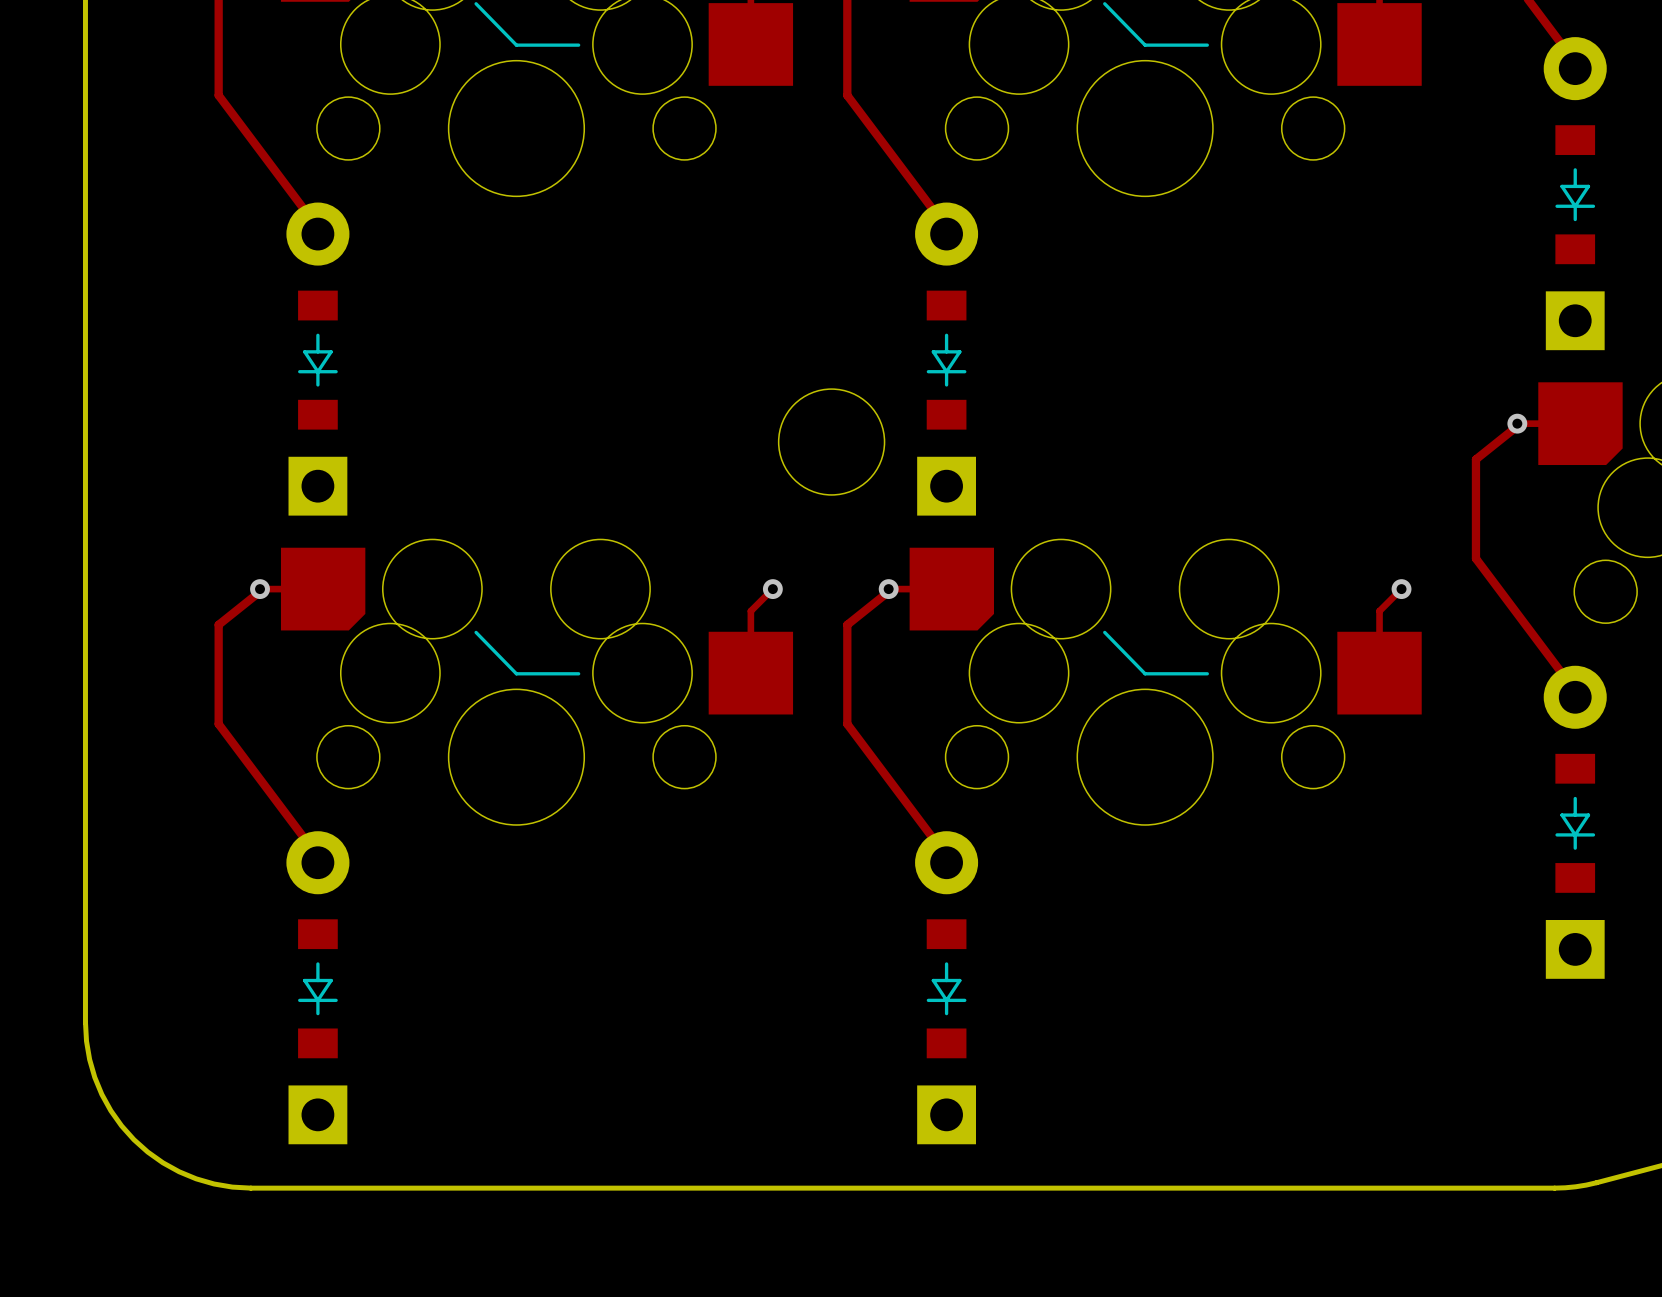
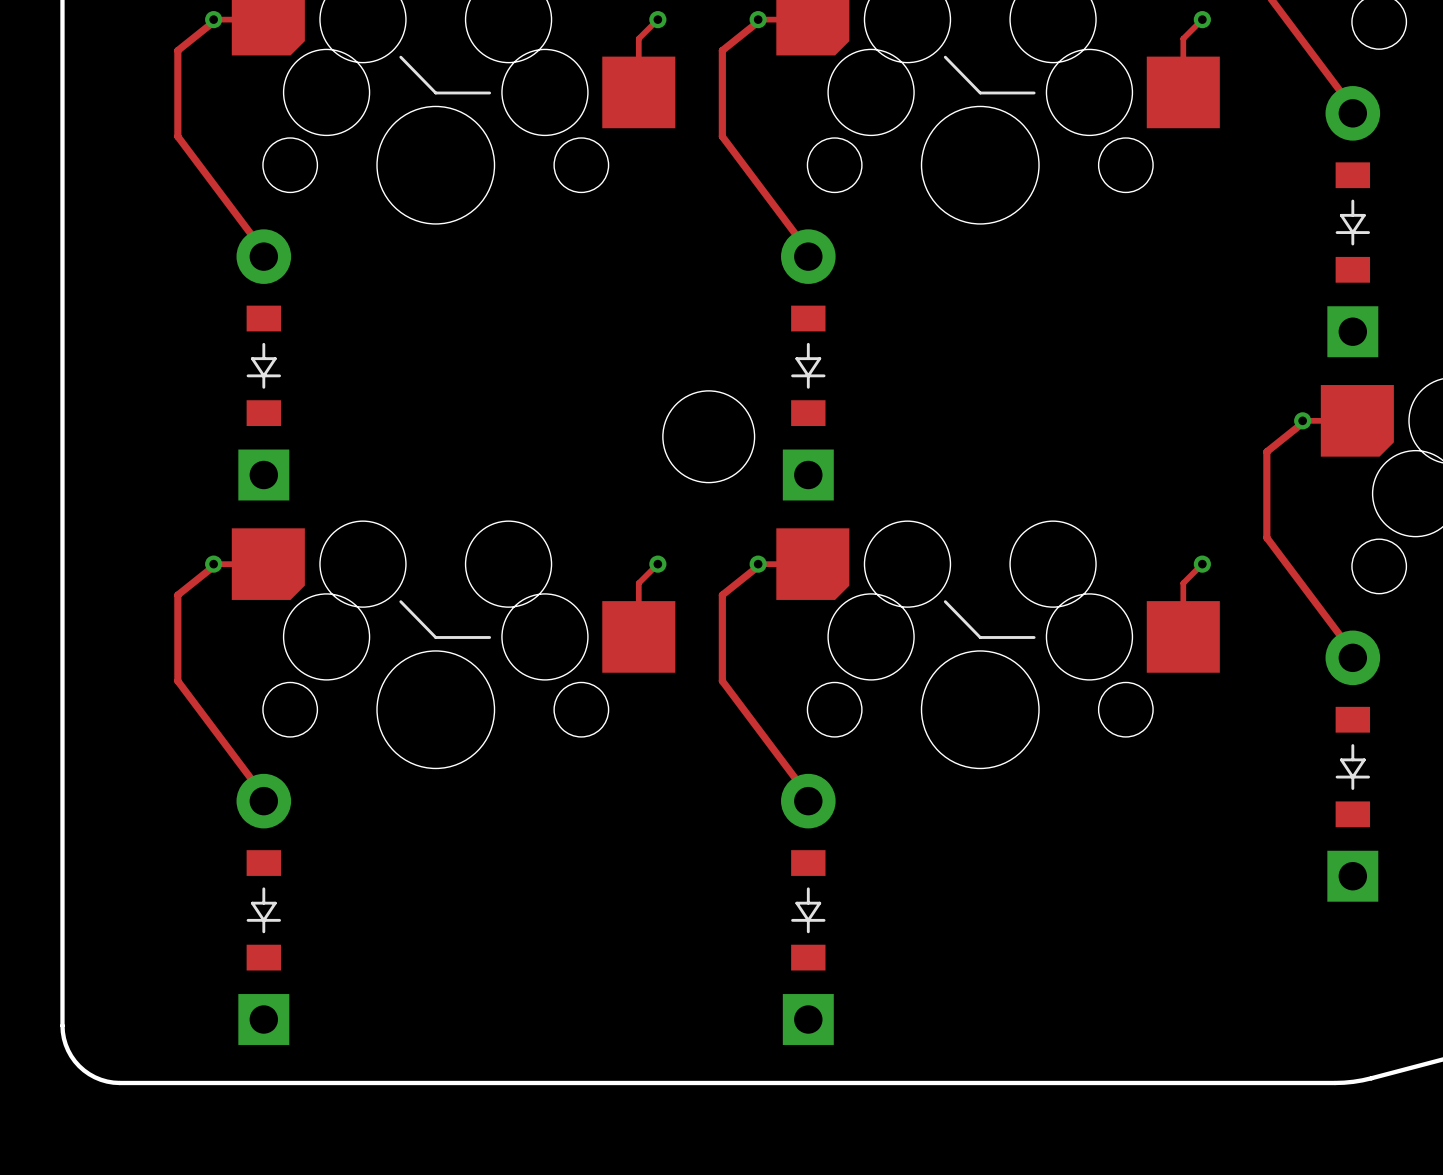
board edge: (85, 1022) (89, 1059) (101, 1094) (110, 1110) (133, 1139) (147, 1152) (179, 1171) (214, 1183) (250, 1188) -> (62, 939) (62, 1032) (68, 1050) (79, 1066) (94, 1077) (113, 1082) (205, 1082)

